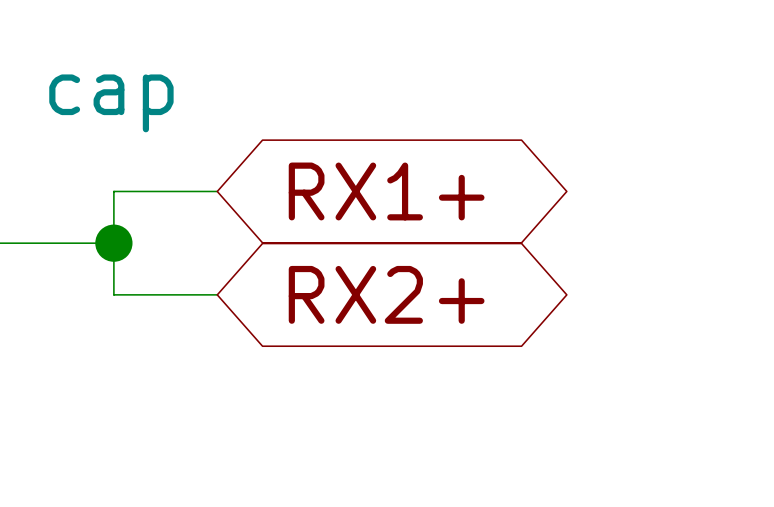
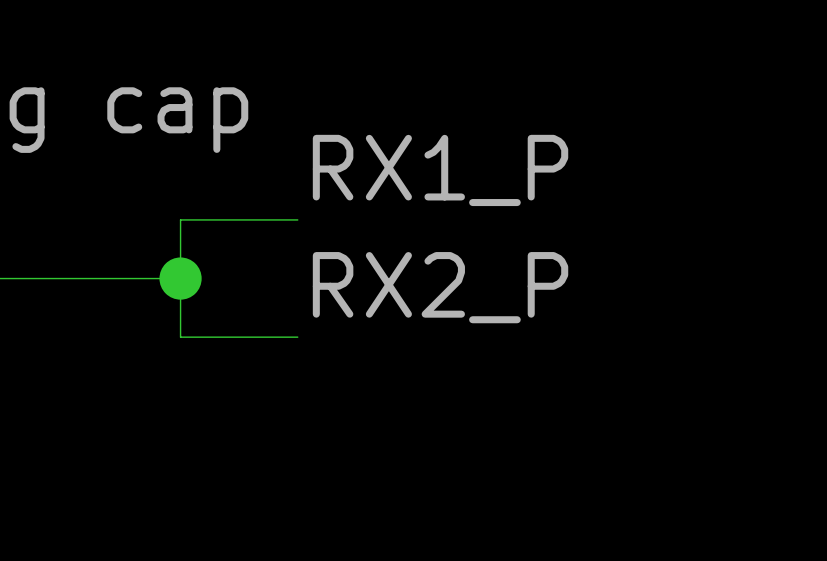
label: none -> RX1_P (440, 170)
global label: RX1+ (386, 191) -> none
label: none -> RX2_P (440, 287)
global label: RX2+ (386, 294) -> none

